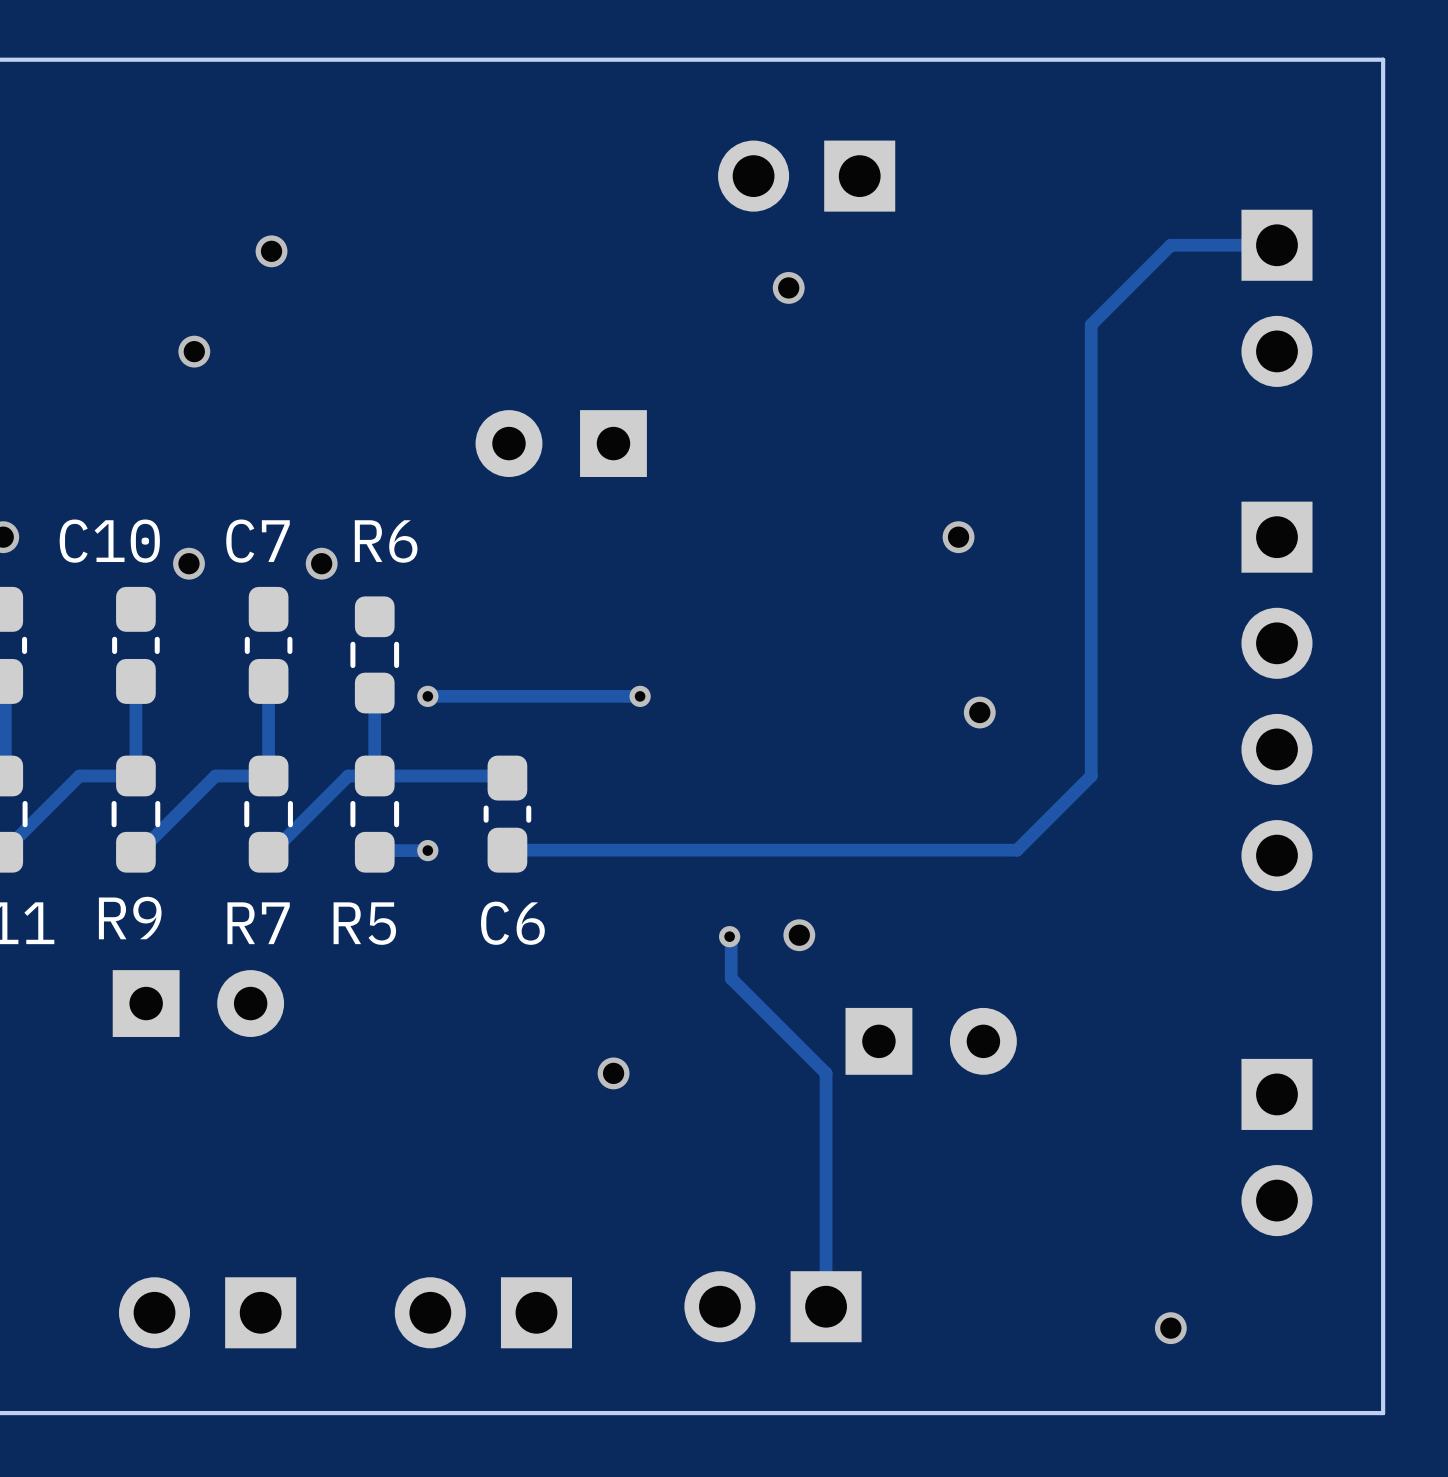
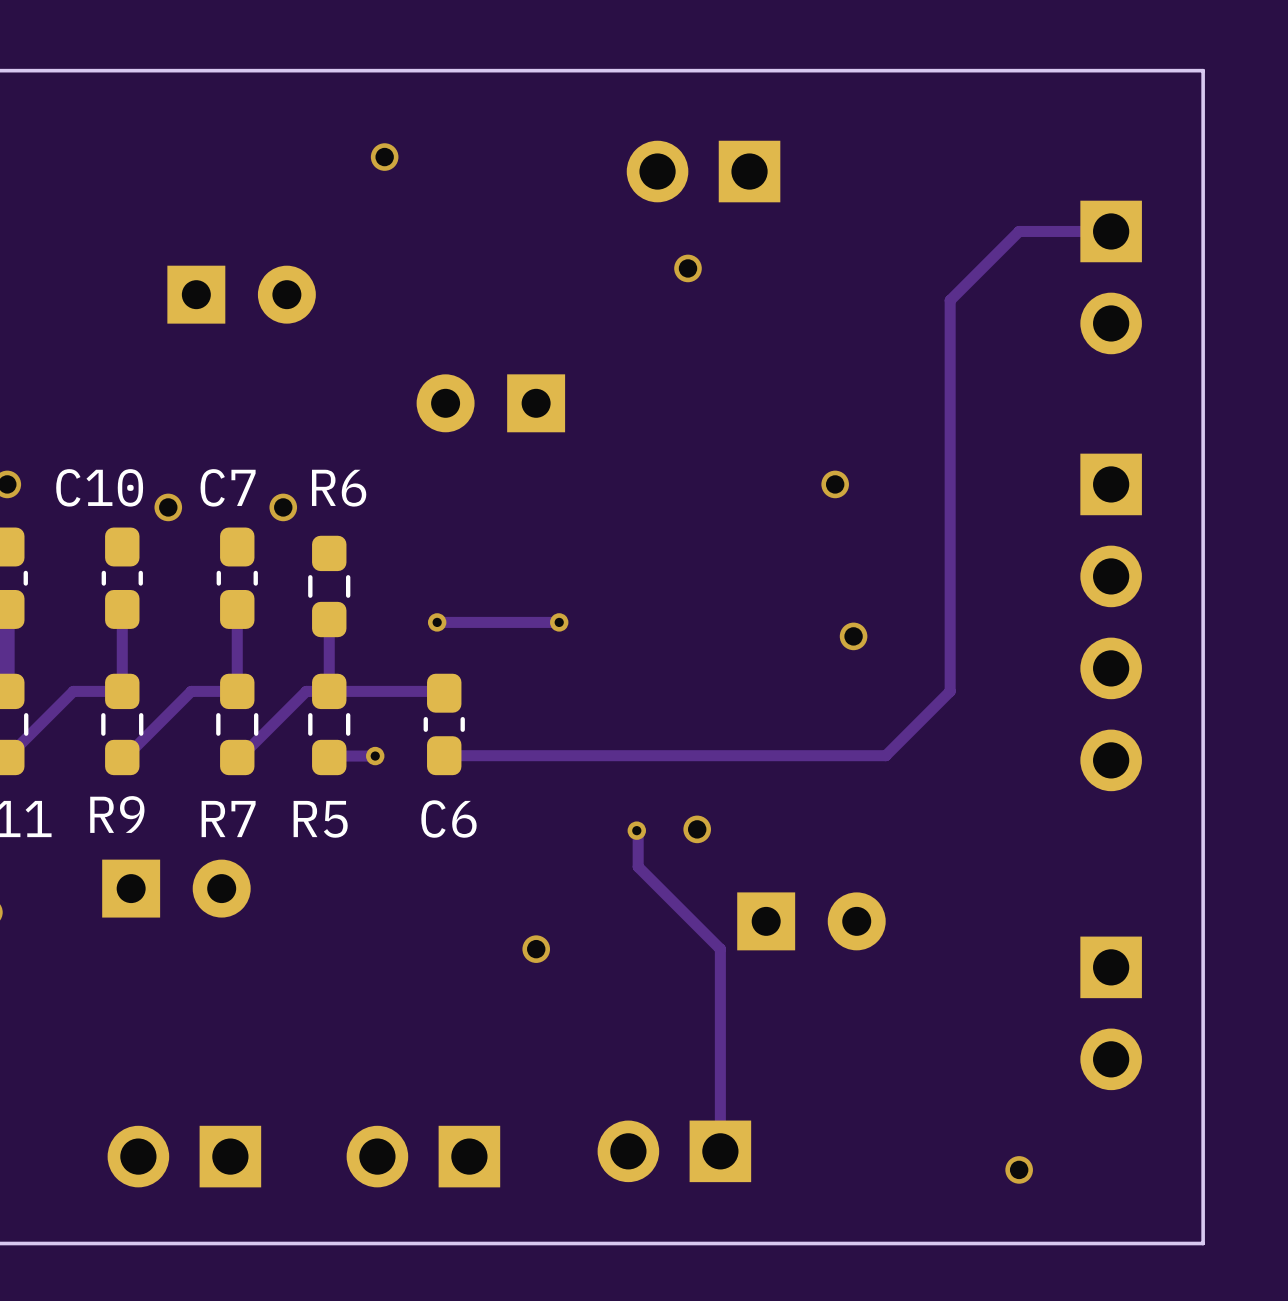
via: none -> (384, 157)
via: (271, 251) -> none
part: none -> (241, 294)
via: (194, 351) -> none
via position: (427, 696) -> (437, 622)
track: (499, 696) (427, 696) -> none

